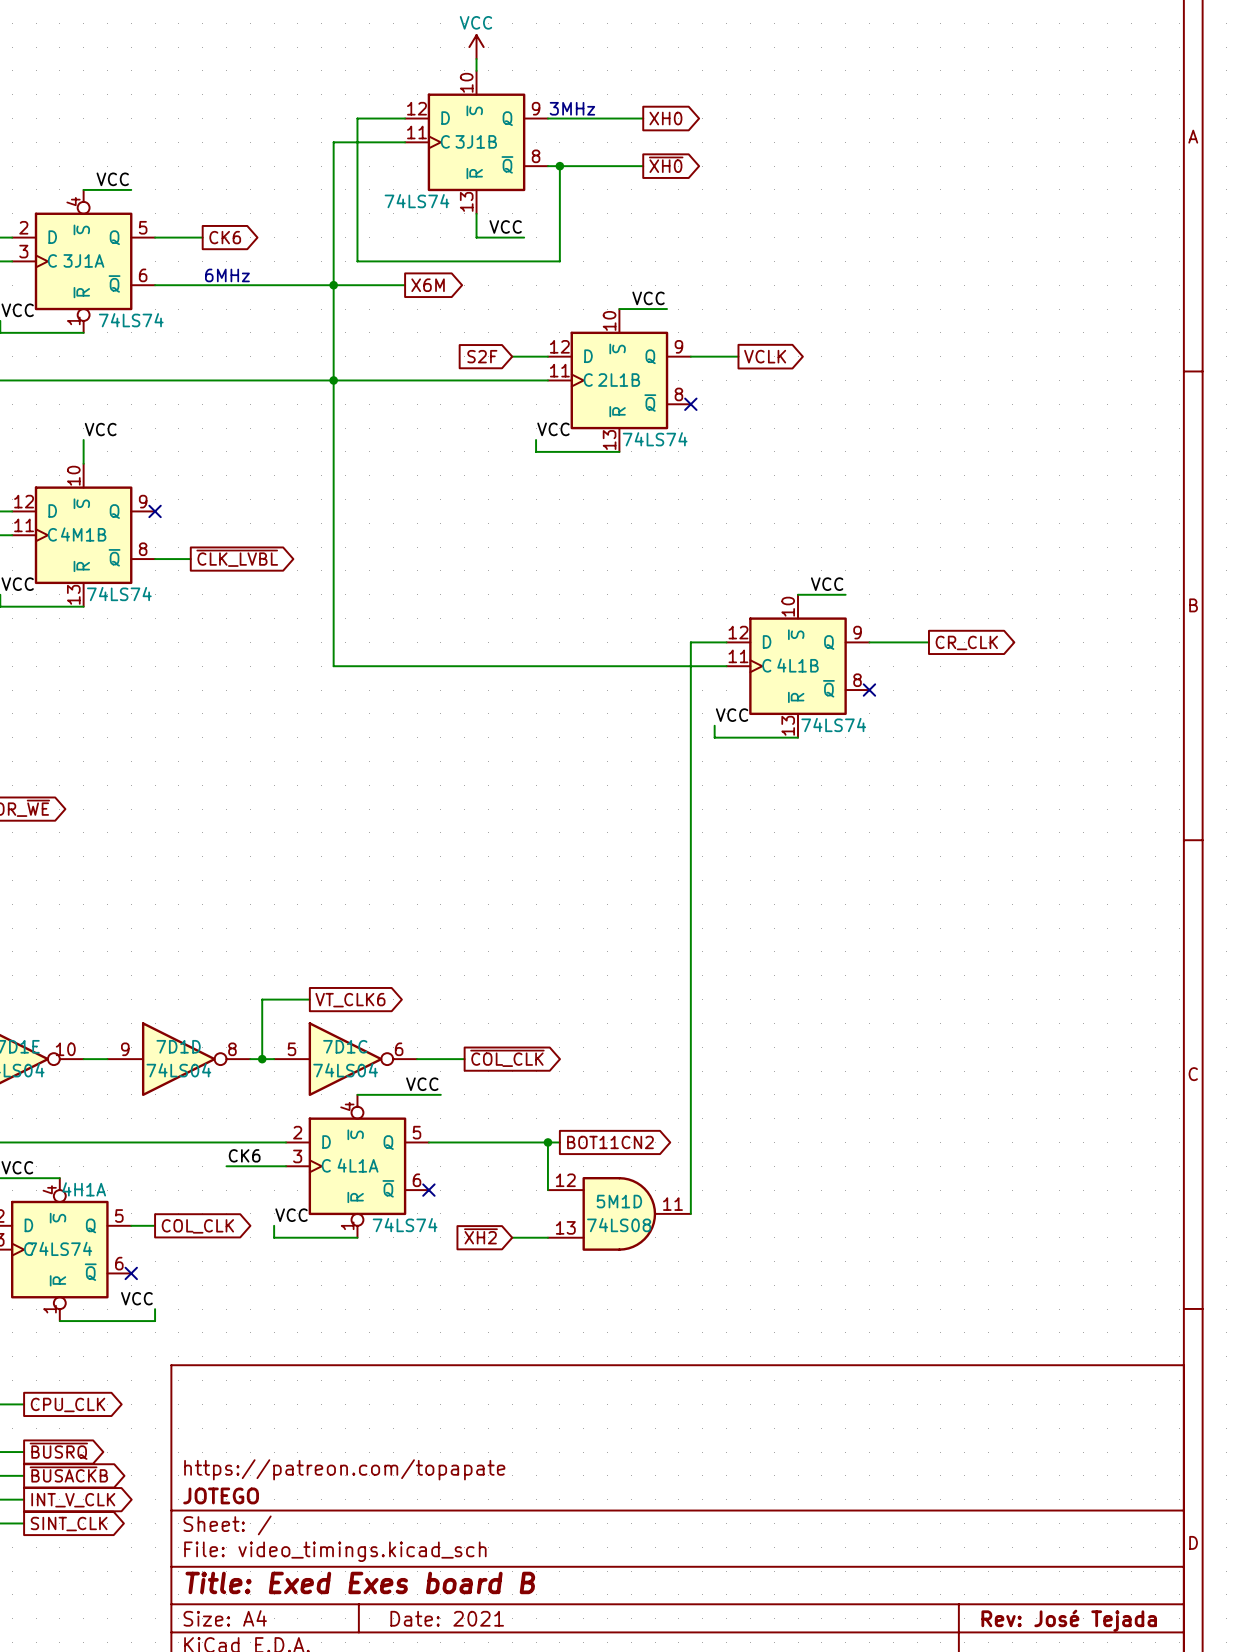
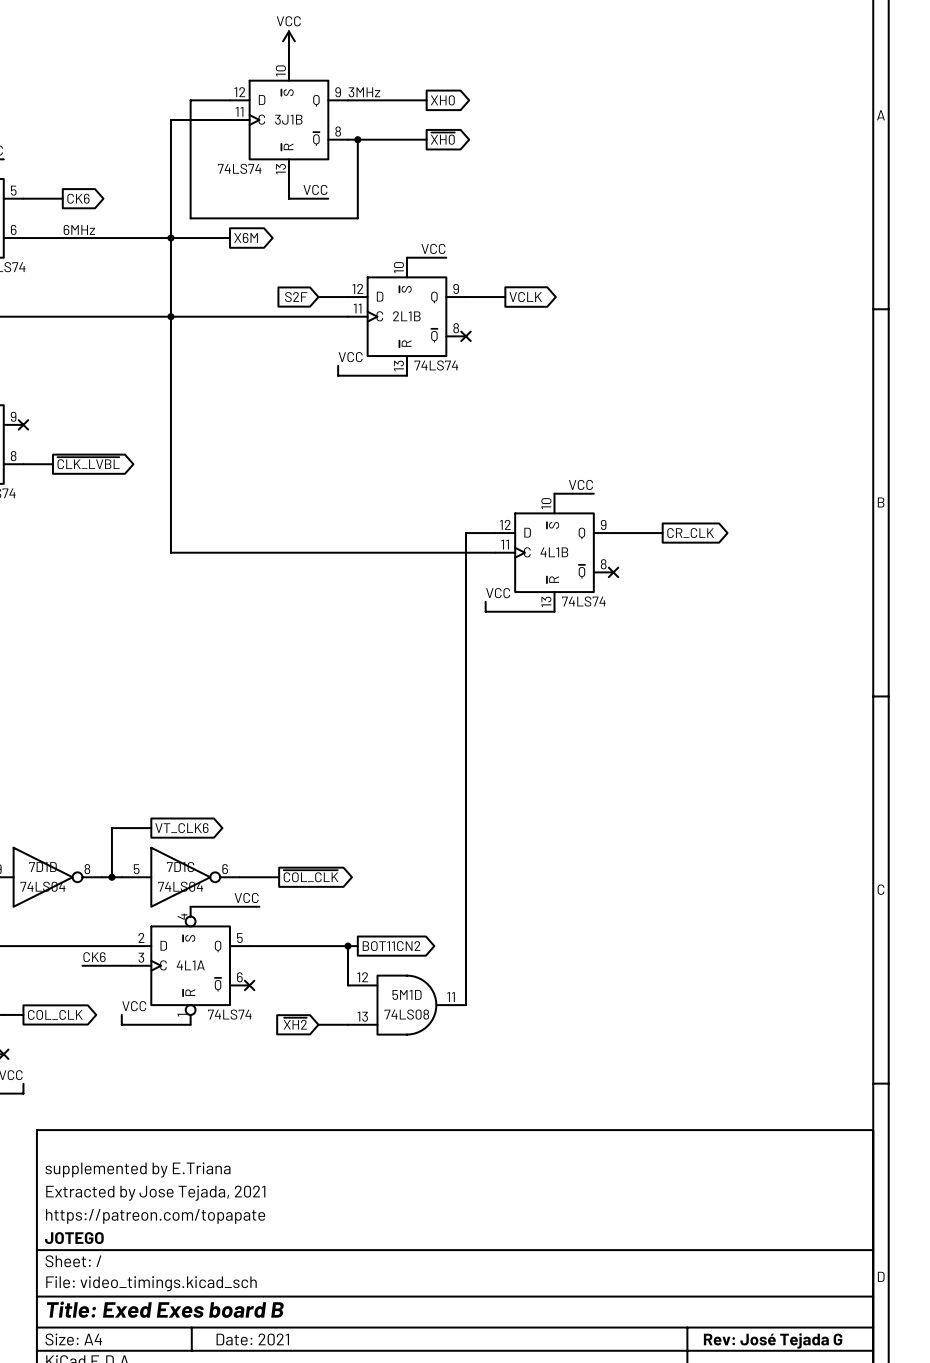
title block: none -> supplemented by E.Triana (138, 1169)
title block: none -> Extracted by Jose Tejada, 2021 (155, 1193)
title block: Rev: José Tejada (1069, 1620) -> Rev: José Tejada G (773, 1340)

